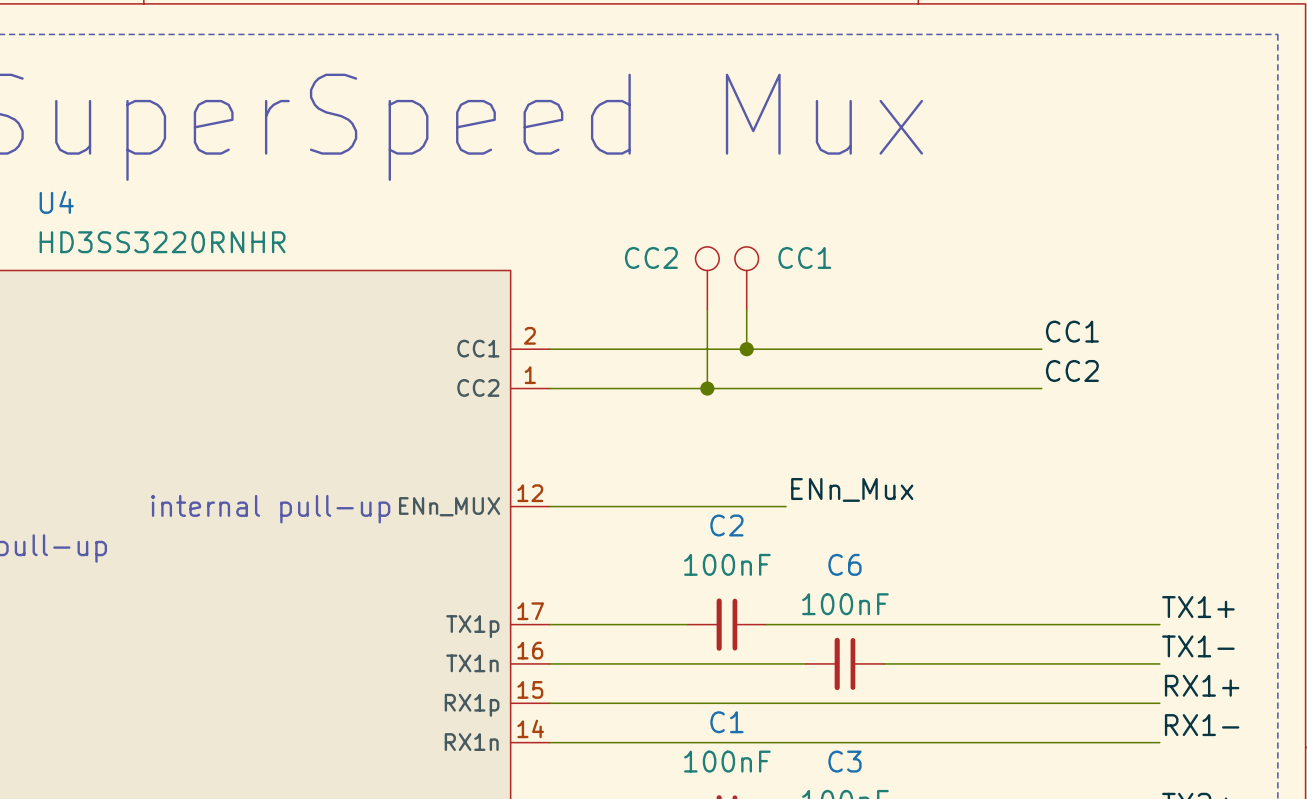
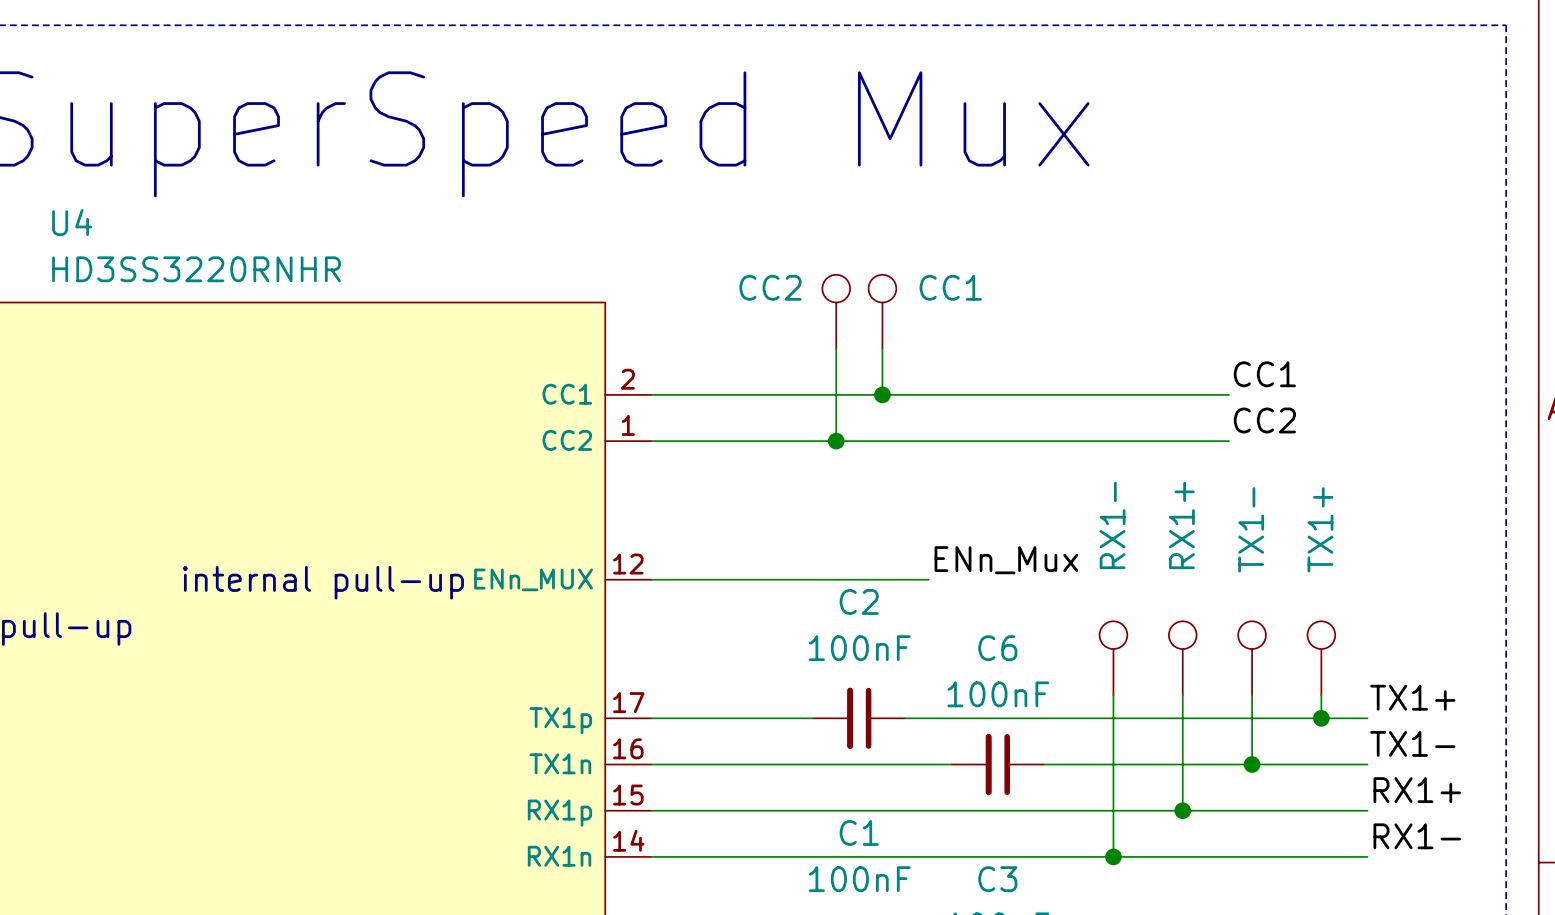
part: none -> RX1- (1113, 658)
part: none -> RX1+ (1182, 658)
part: none -> TX1- (1252, 658)
part: none -> TX1+ (1321, 658)
wire: none -> (1113, 695) (1113, 856)
wire: none -> (1182, 695) (1182, 810)
wire: none -> (1252, 695) (1252, 764)
wire: none -> (1321, 695) (1321, 718)
junction: none -> (1321, 718)
junction: none -> (1252, 764)
junction: none -> (1182, 810)
junction: none -> (1113, 856)

